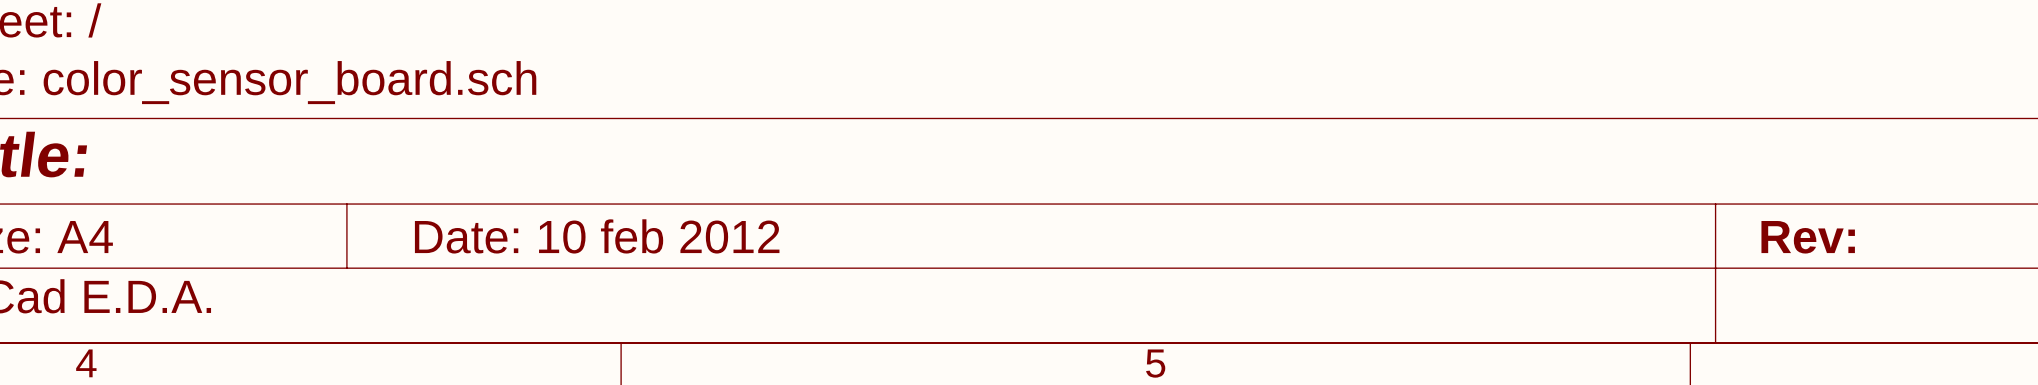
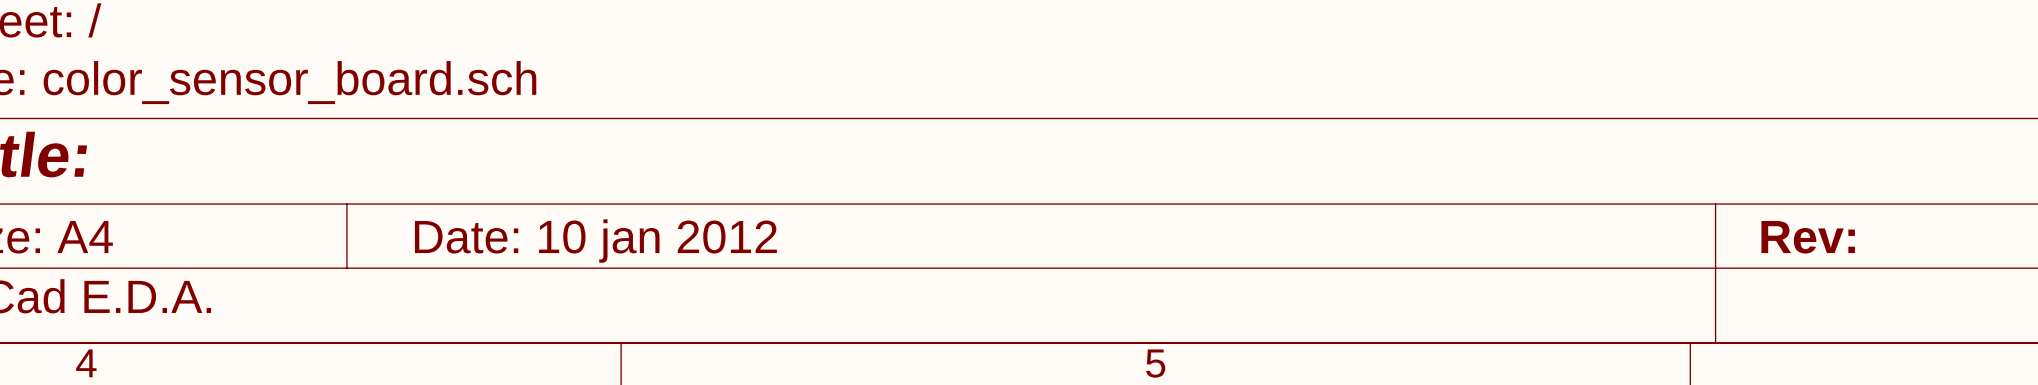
title block: Date: 10 feb 2012 (597, 236) -> Date: 10 jan 2012 (595, 241)

